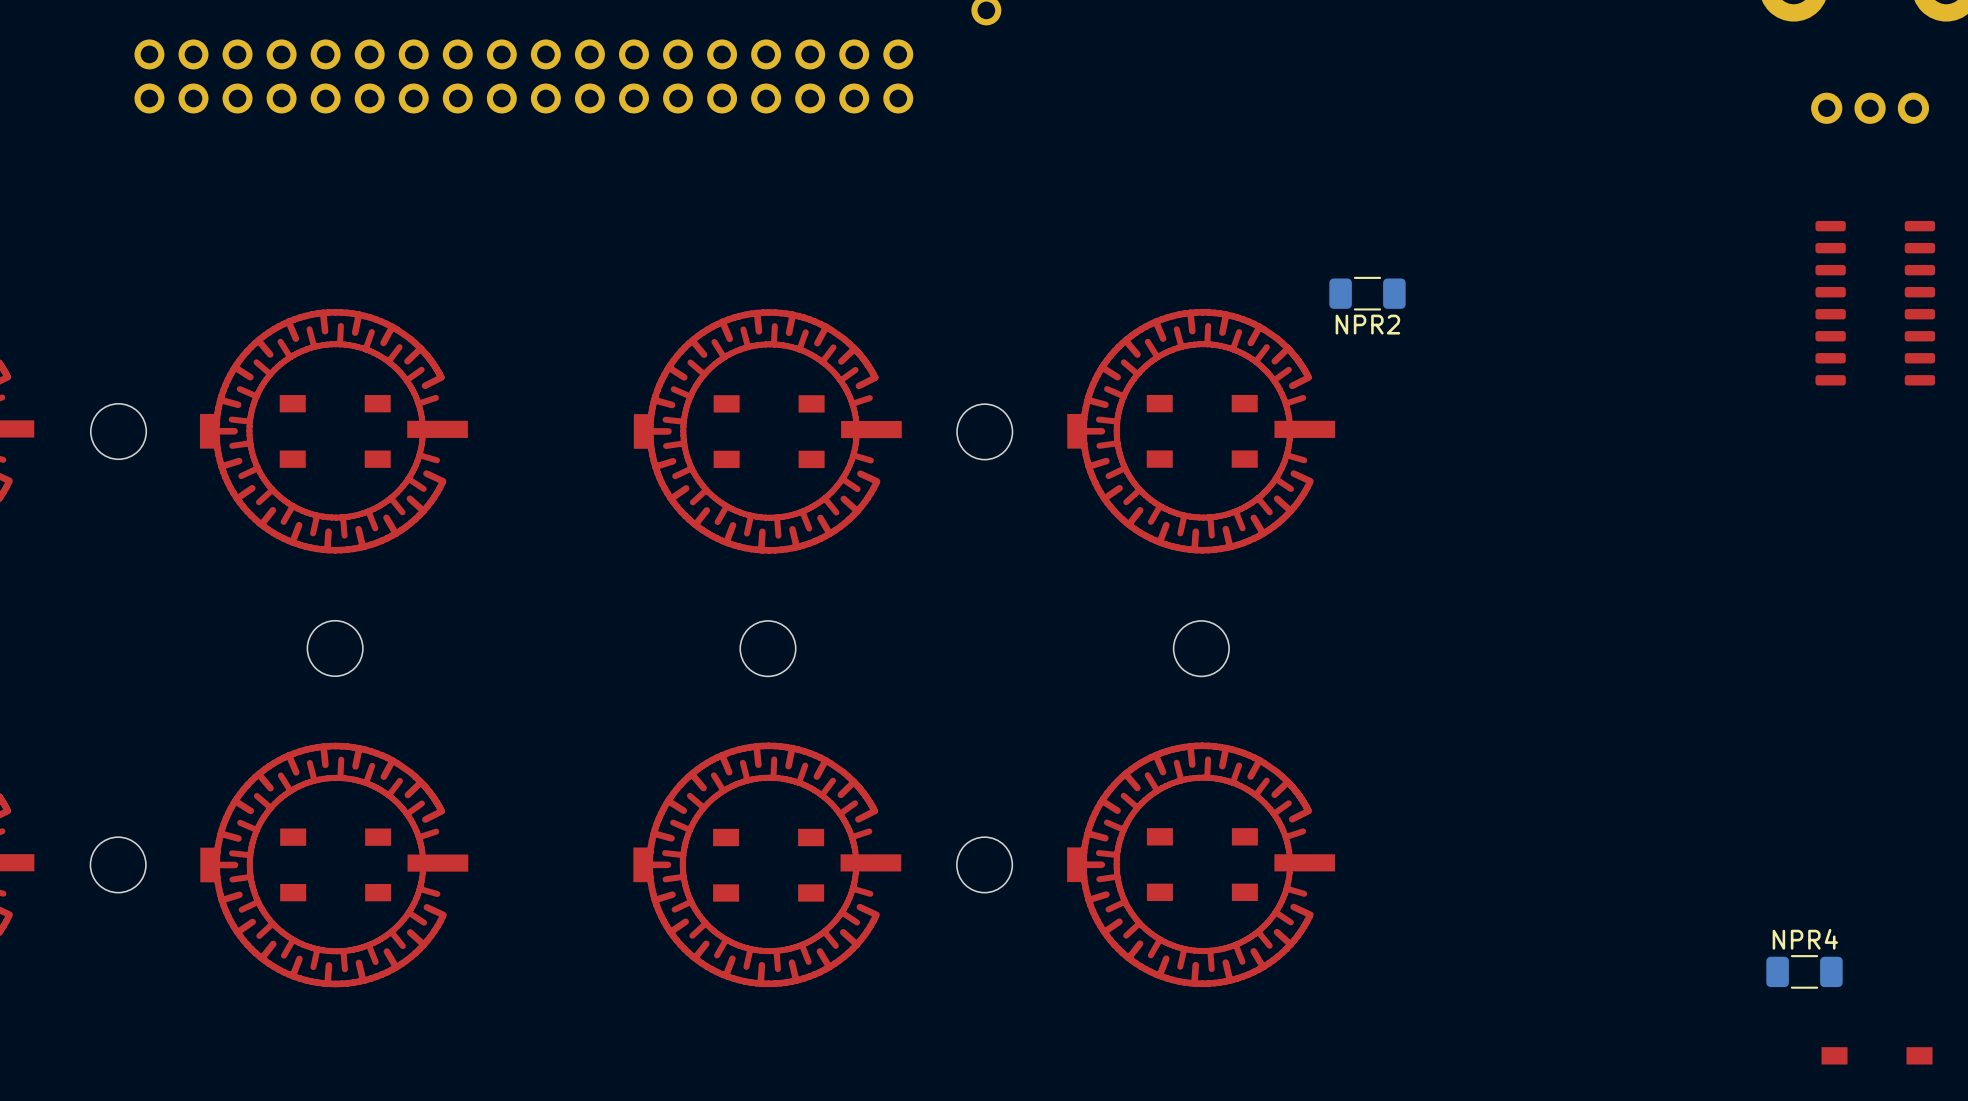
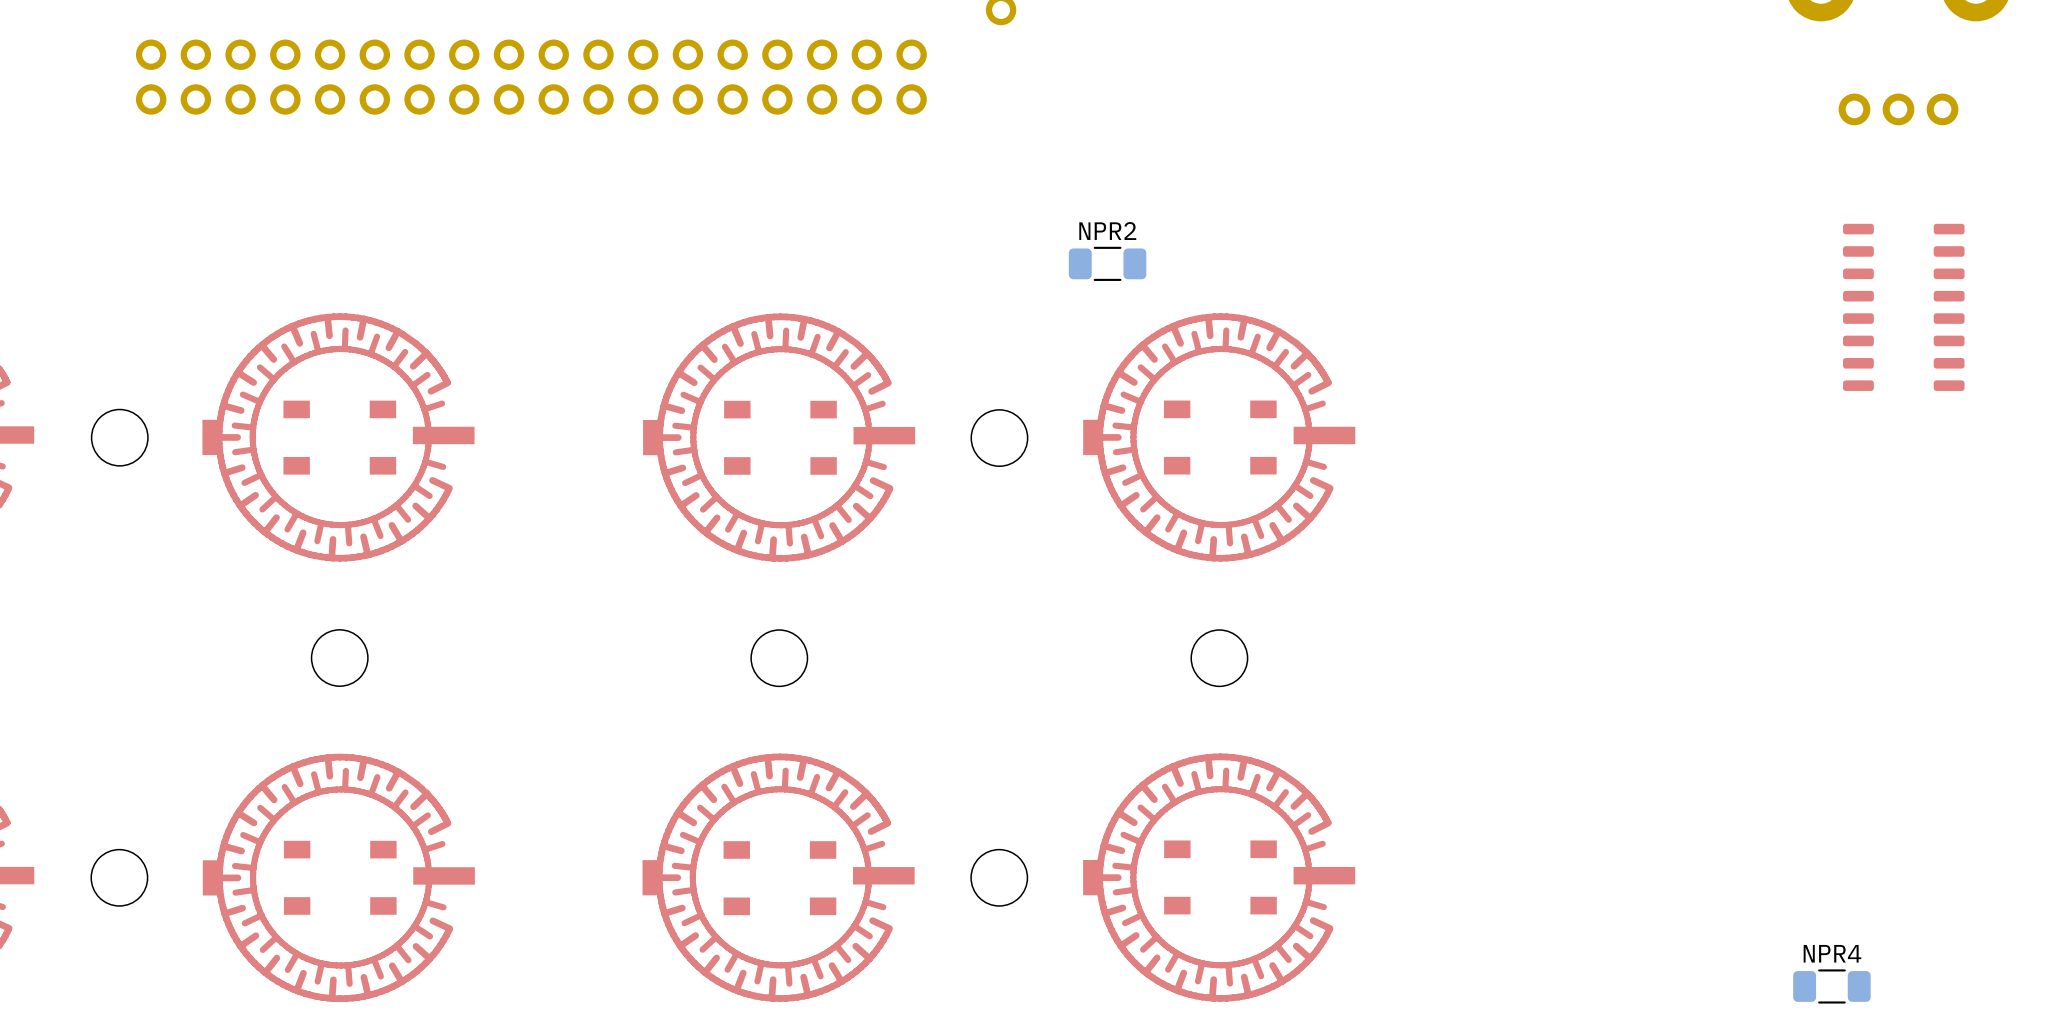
NPR2 position: (1367, 293) -> (1107, 263)
NPR2 name position: NPR2 (1367, 324) -> NPR2 (1107, 231)

